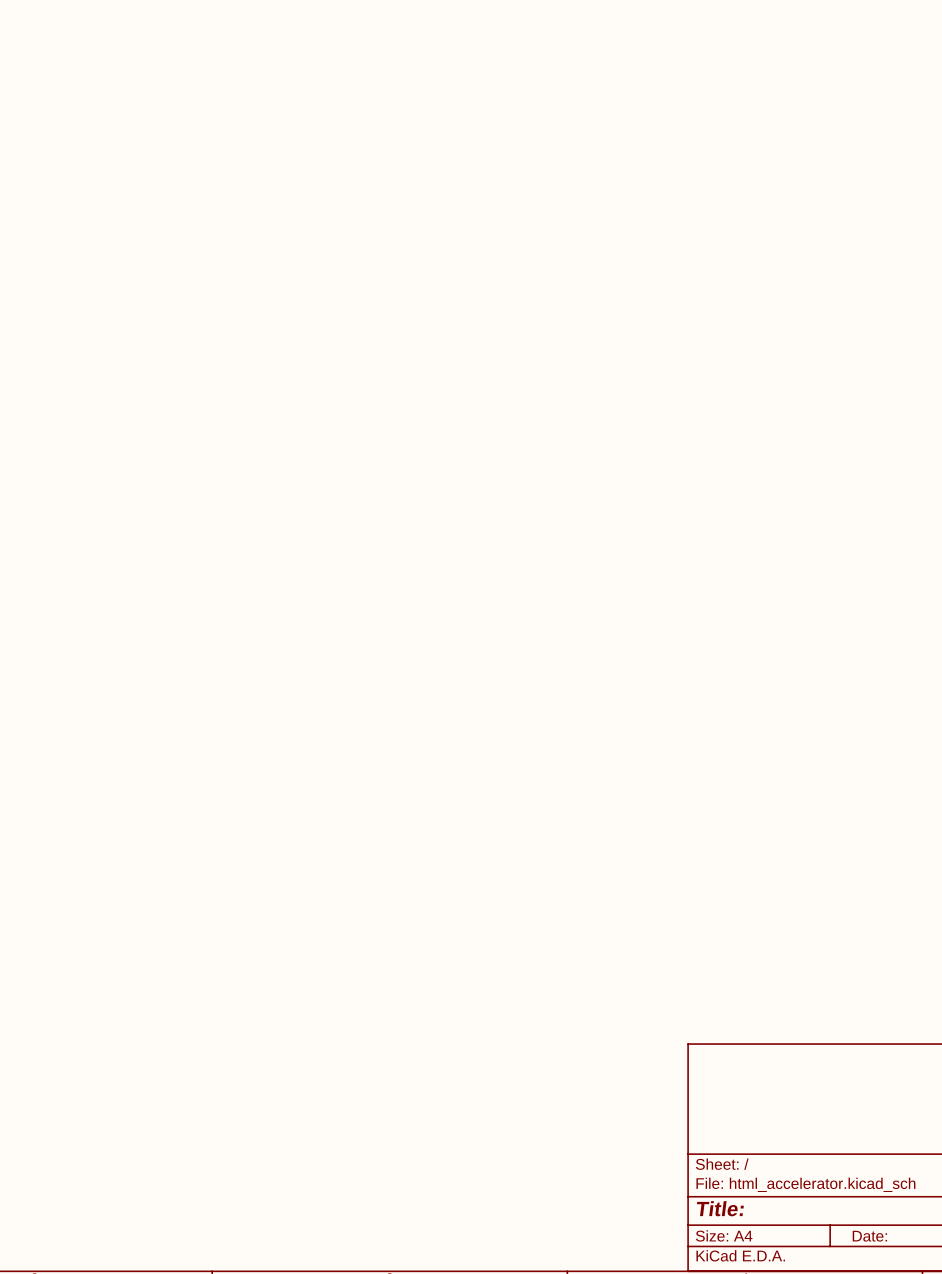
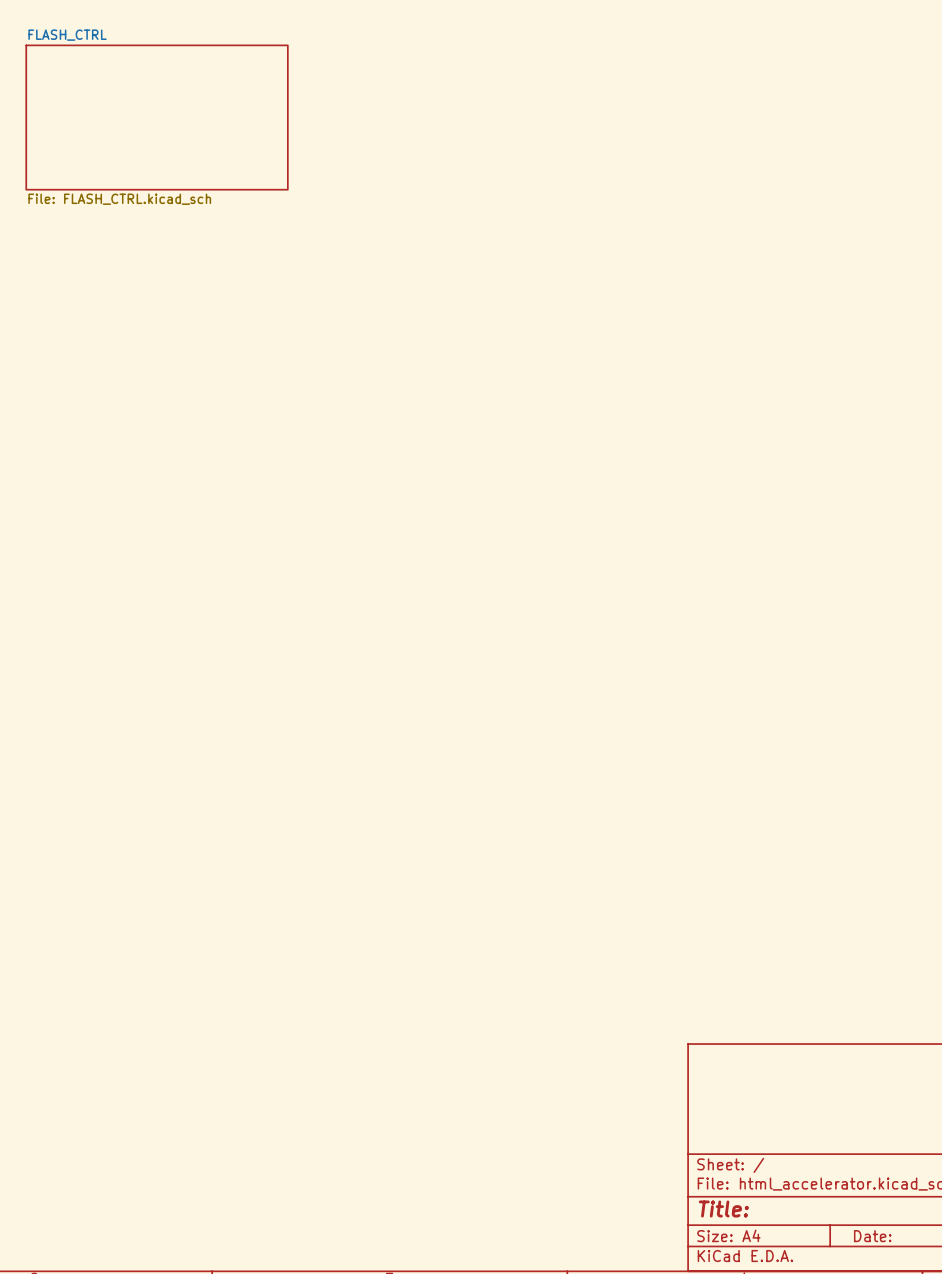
sheet FLASH_CTRL: none -> File: FLASH_CTRL.kicad_sch (157, 117)

